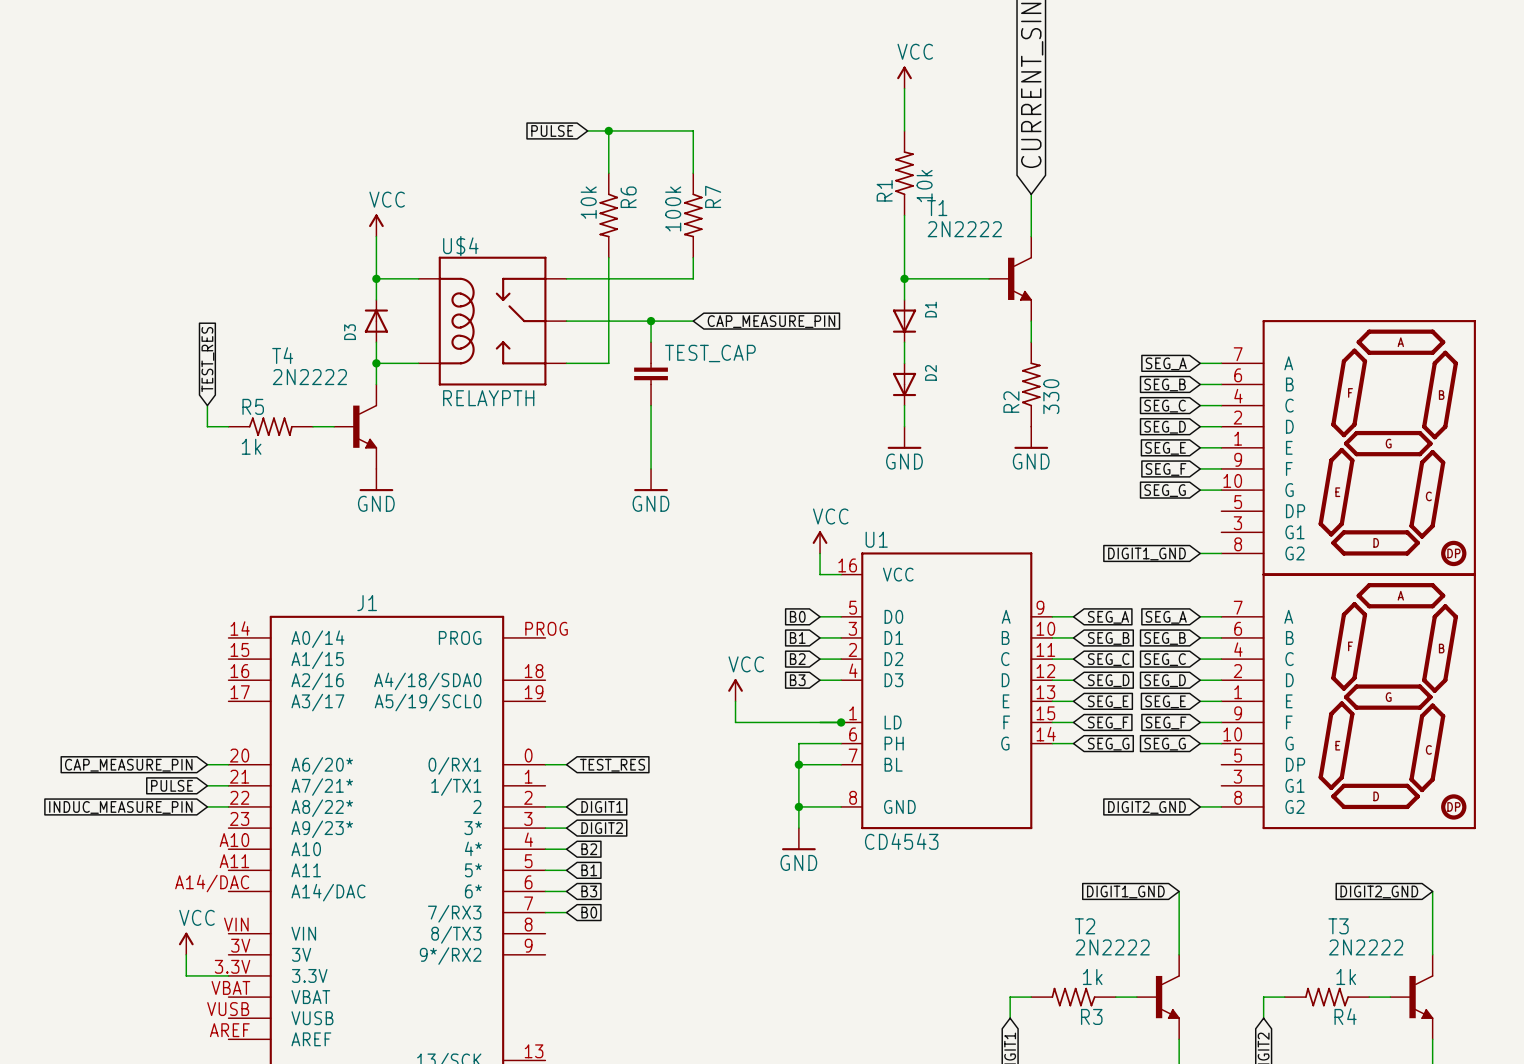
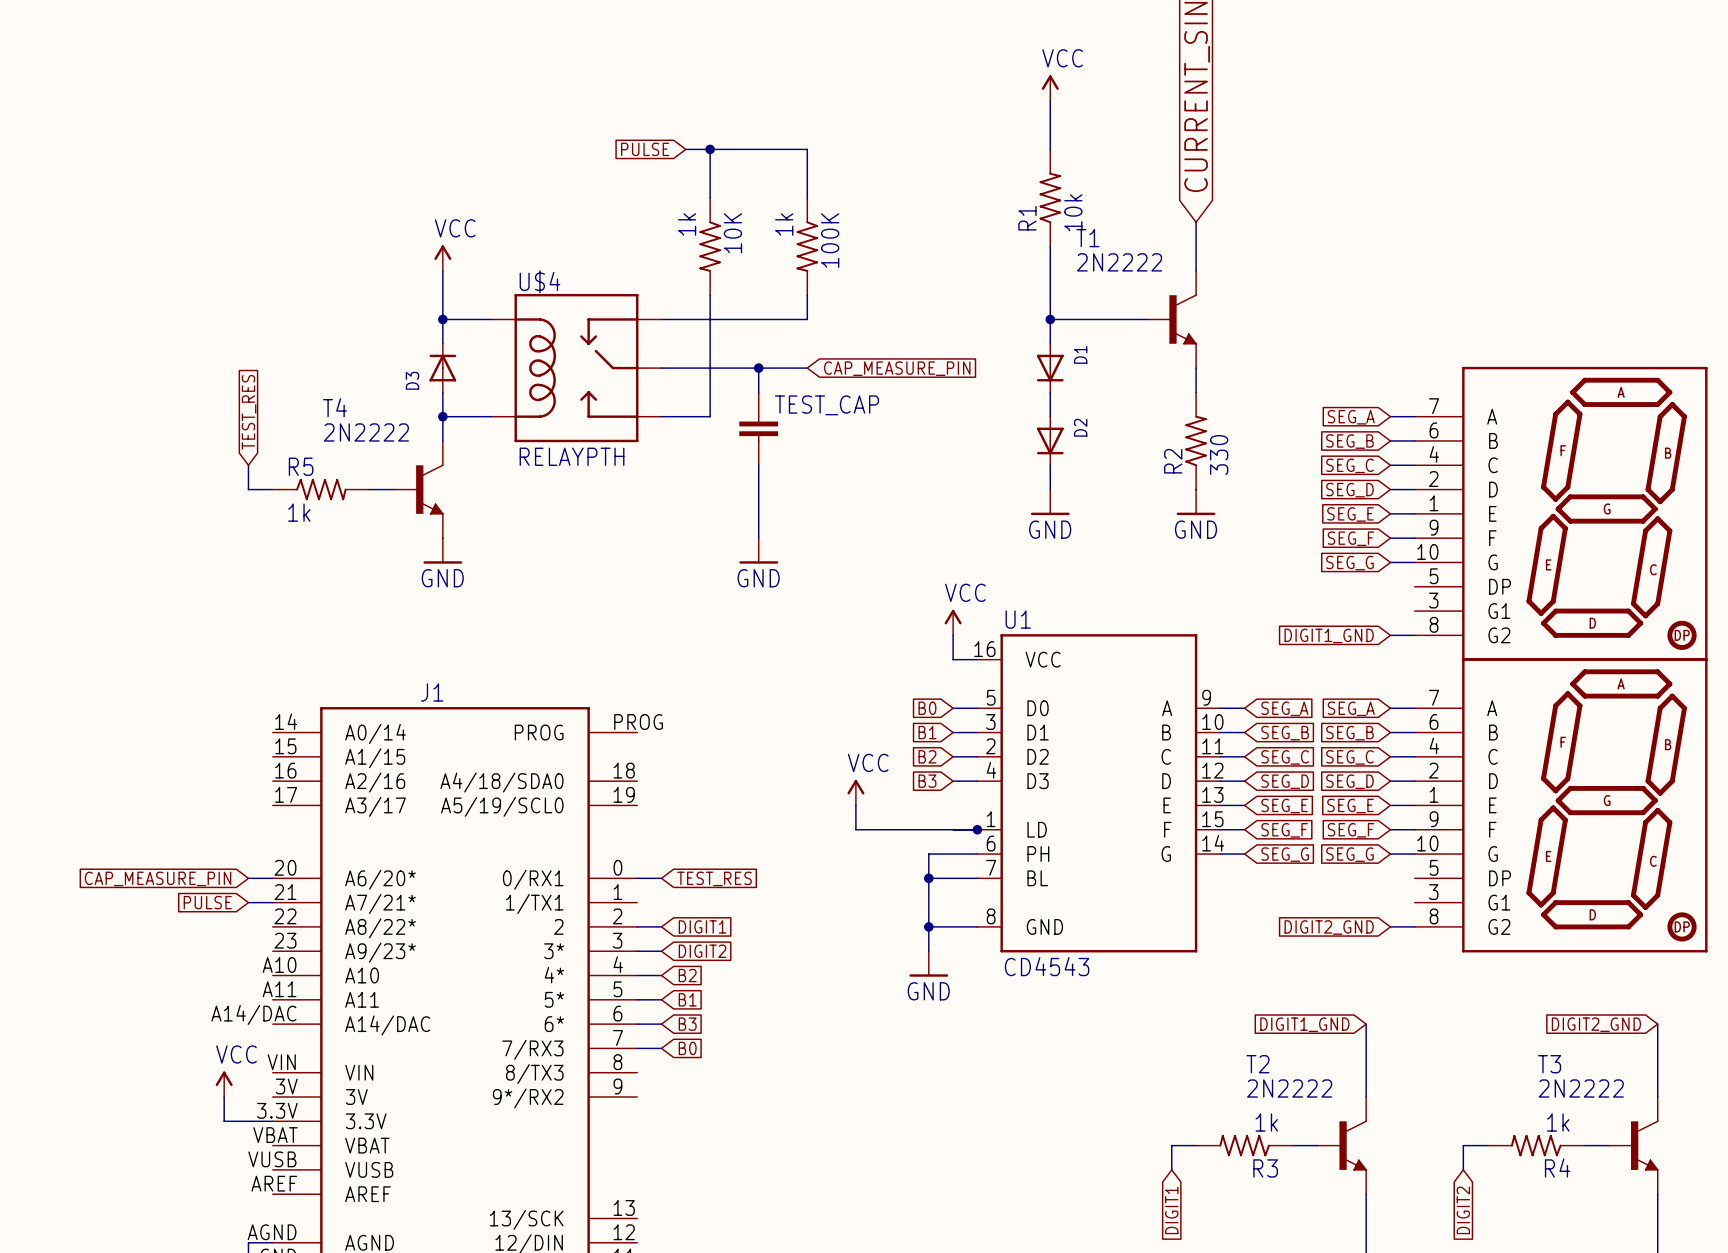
R7 name: R7 (713, 196) -> 100K (830, 240)
R6 name: R6 (628, 197) -> 10K (732, 233)
R6 value: 10k (588, 202) -> 1k (687, 224)
R7 value: 100k (673, 208) -> 1k (784, 224)
wire: (207, 806) (228, 806) -> none
global label: INDUC_MEASURE_PIN (120, 807) -> none

